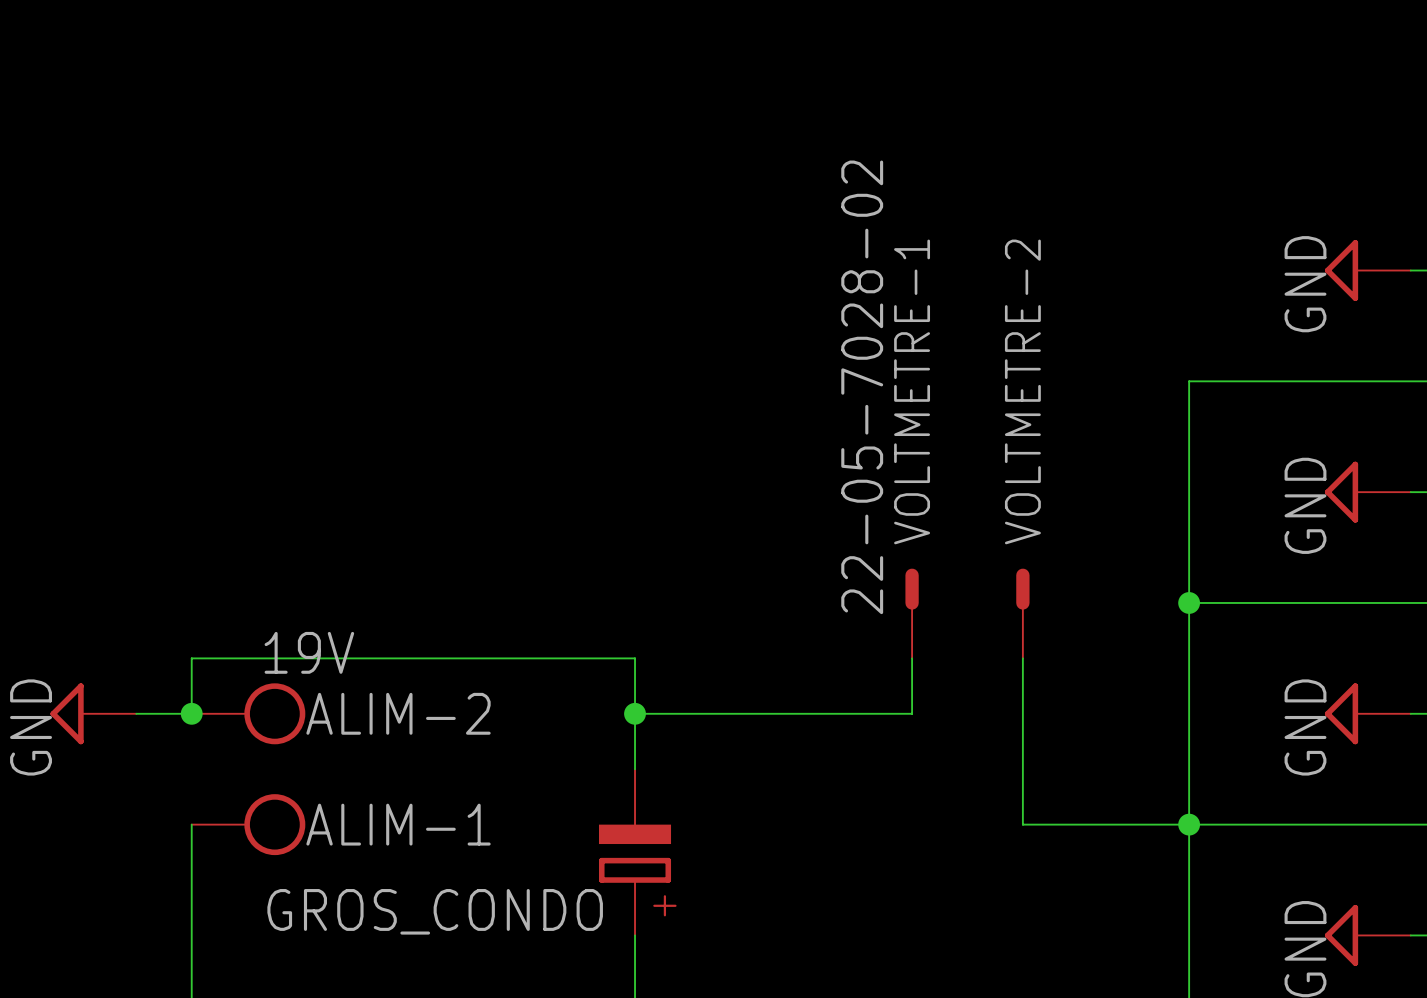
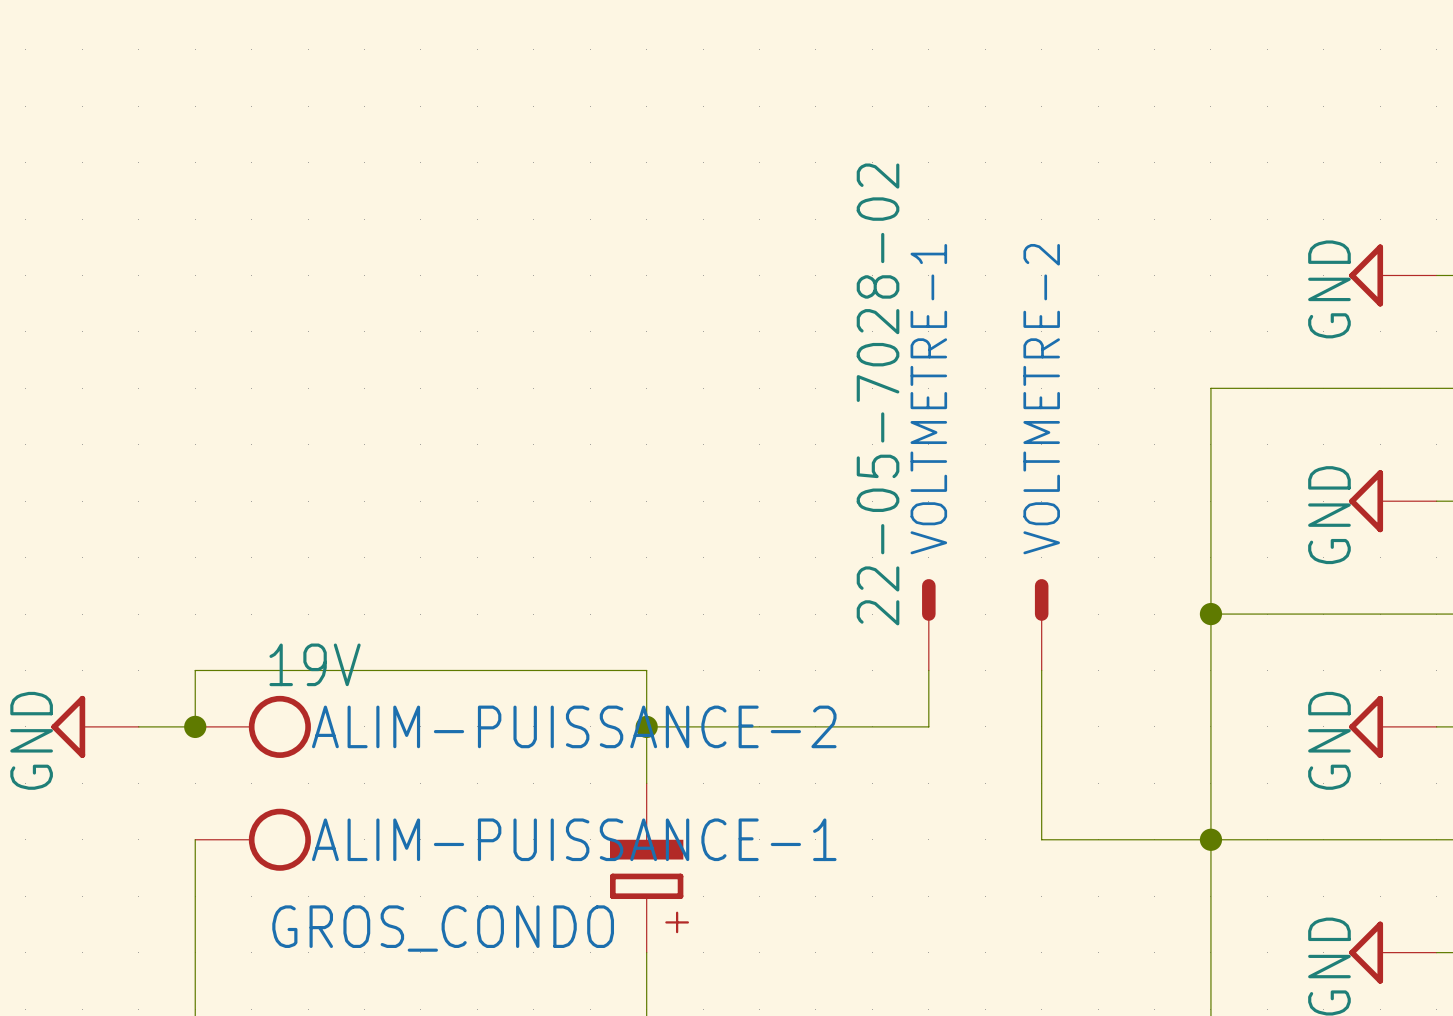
ALIM-2 name: ALIM-2 (398, 713) -> ALIM-PUISSANCE-2 (574, 726)
ALIM-1 name: ALIM-1 (398, 824) -> ALIM-PUISSANCE-1 (574, 839)

